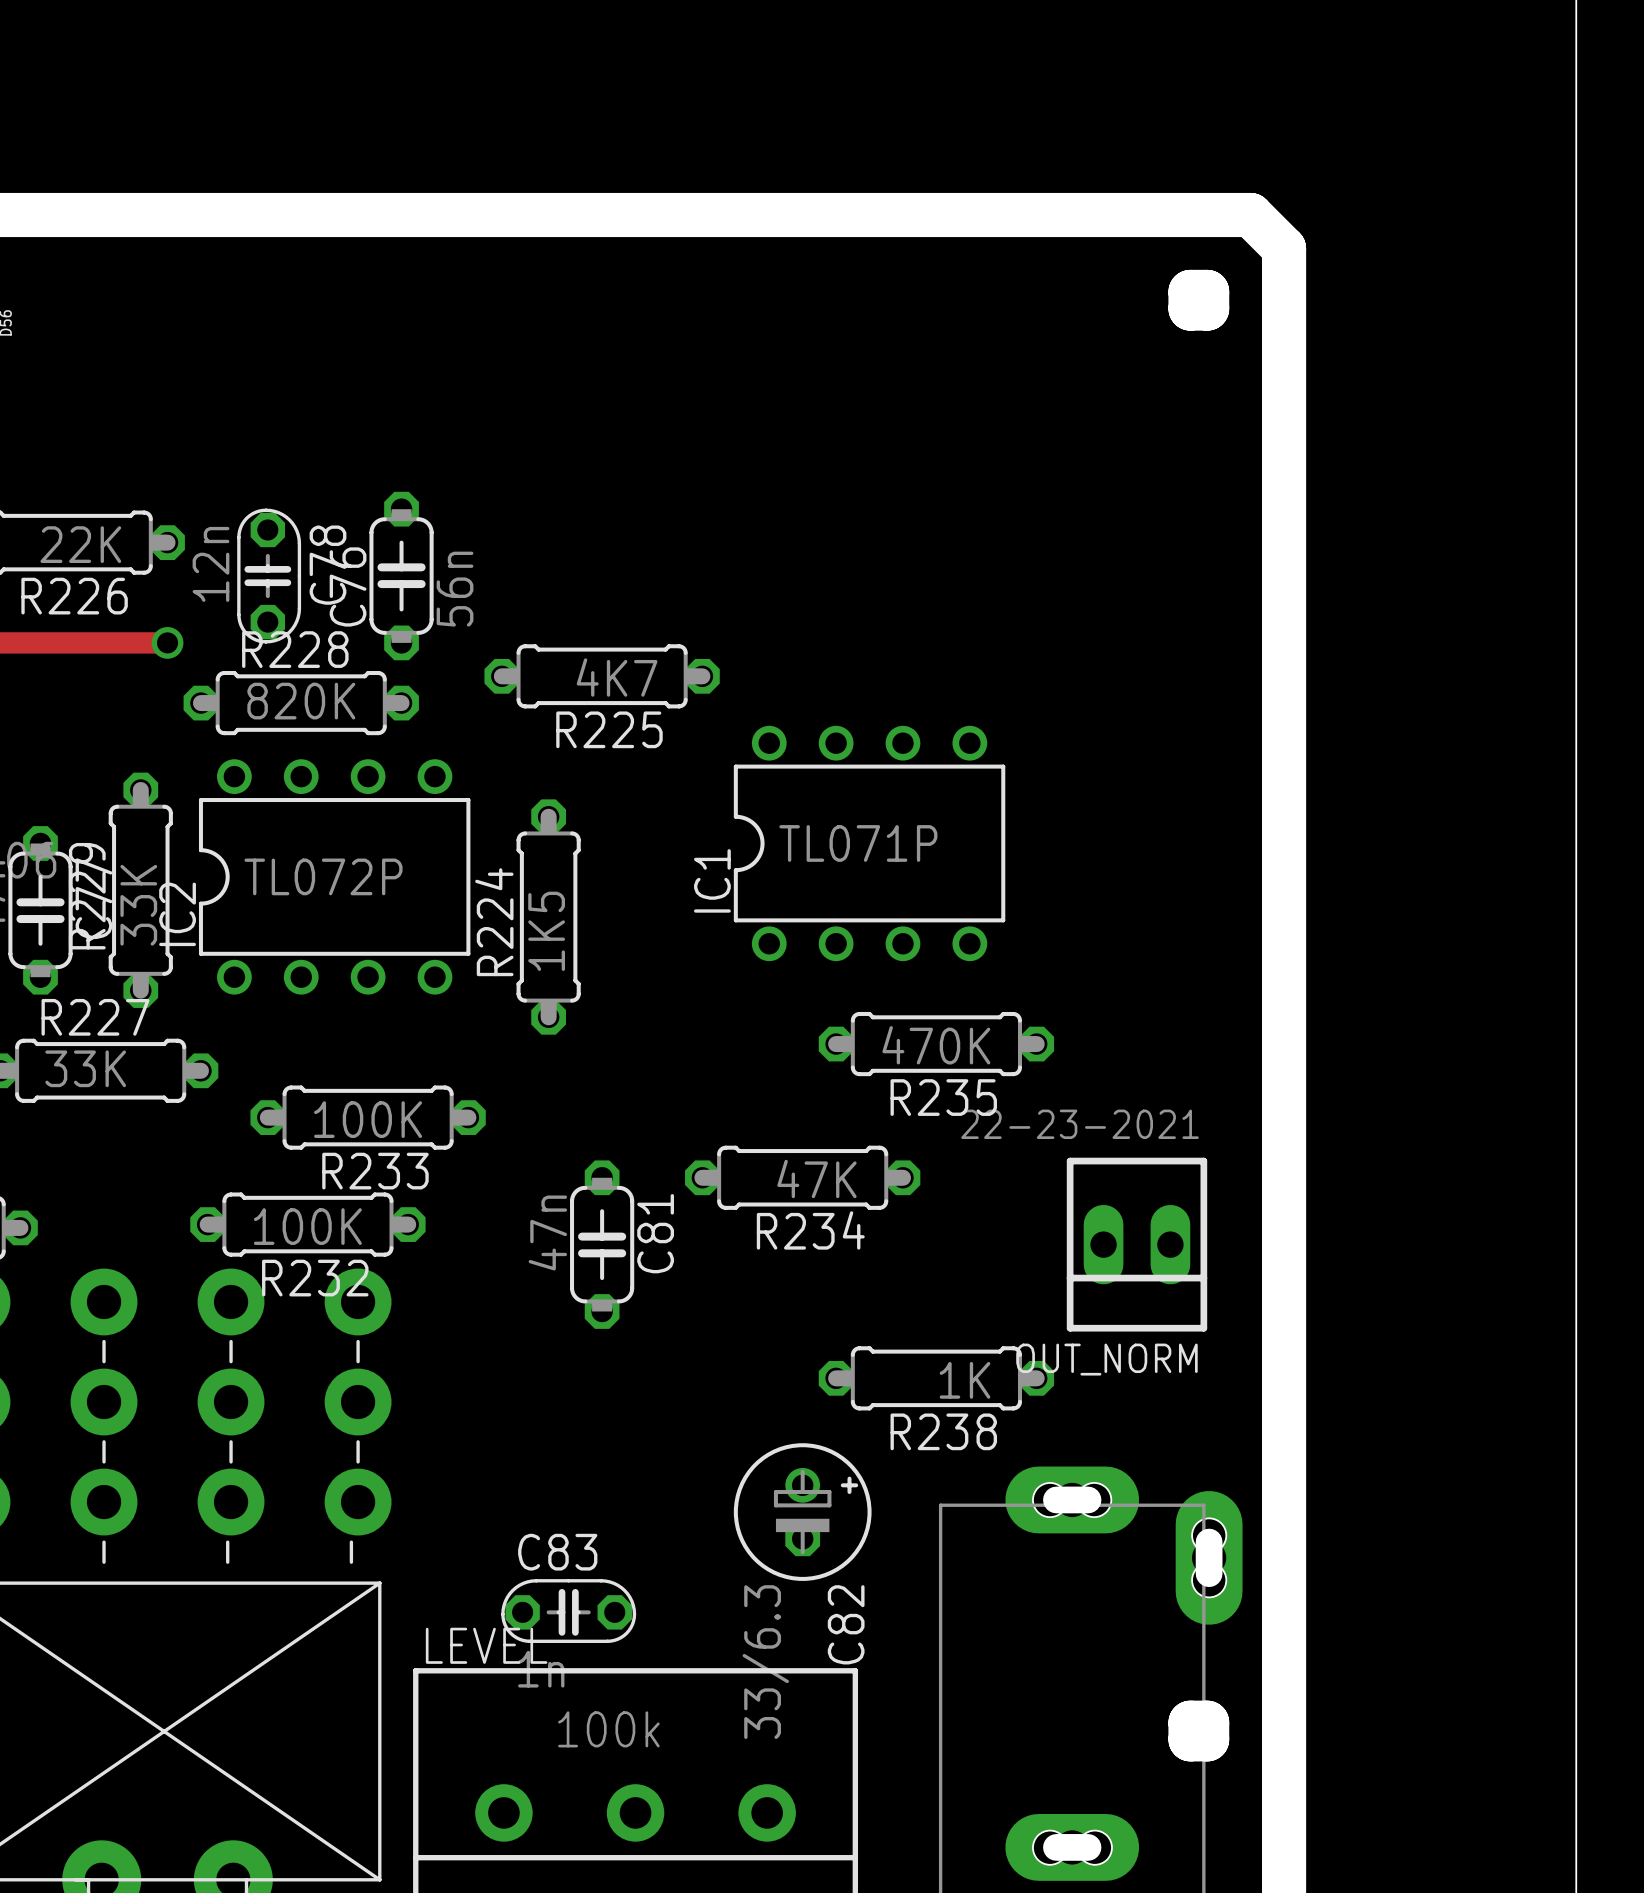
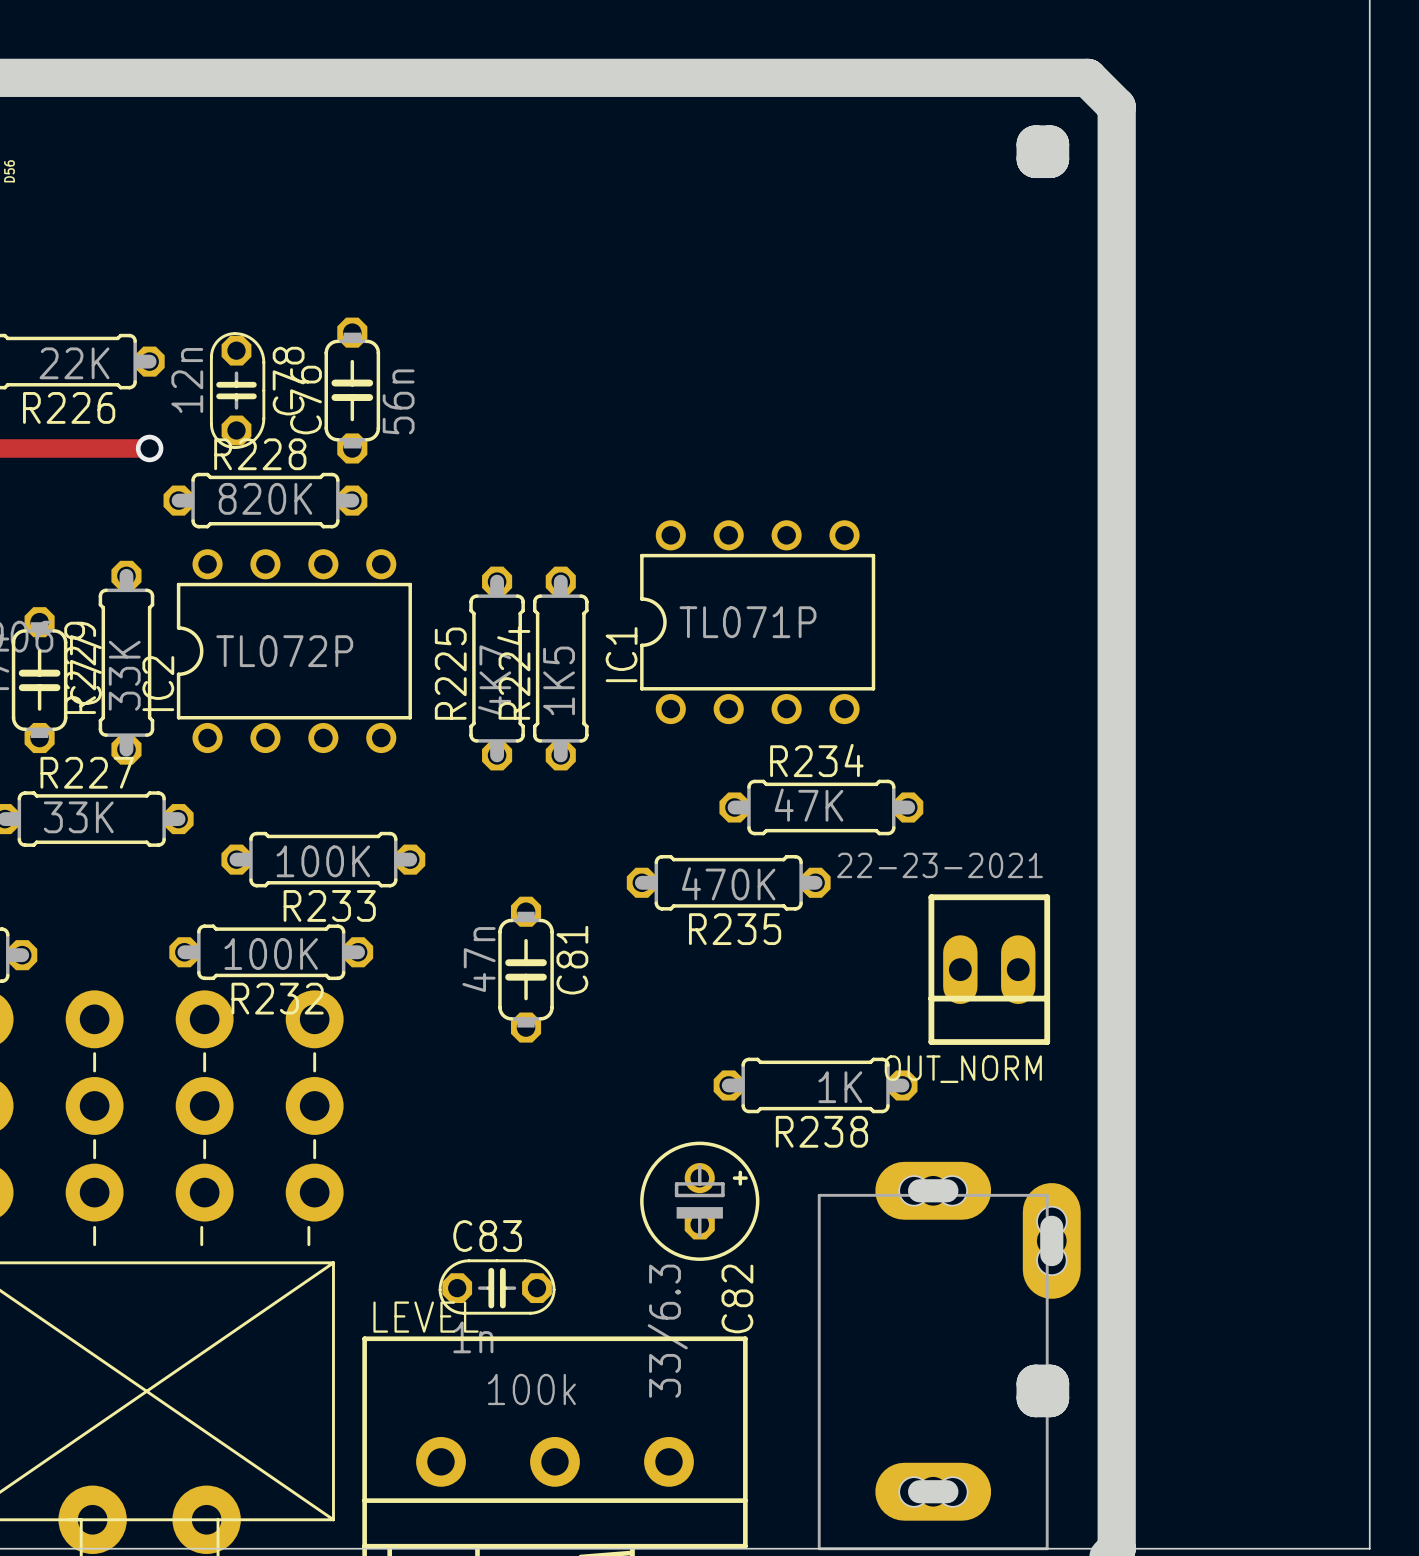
R225 rotation: 0° (602, 676) -> 90° clockwise (497, 668)
R225 position: (602, 676) -> (497, 668)
R224 position: (548, 917) -> (560, 668)
R235 position: (936, 1044) -> (728, 882)
R234 position: (802, 1177) -> (821, 807)
R234 value position: 47K (816, 1178) -> 47K (809, 805)
R234 name position: R234 (810, 1230) -> R234 (816, 760)

